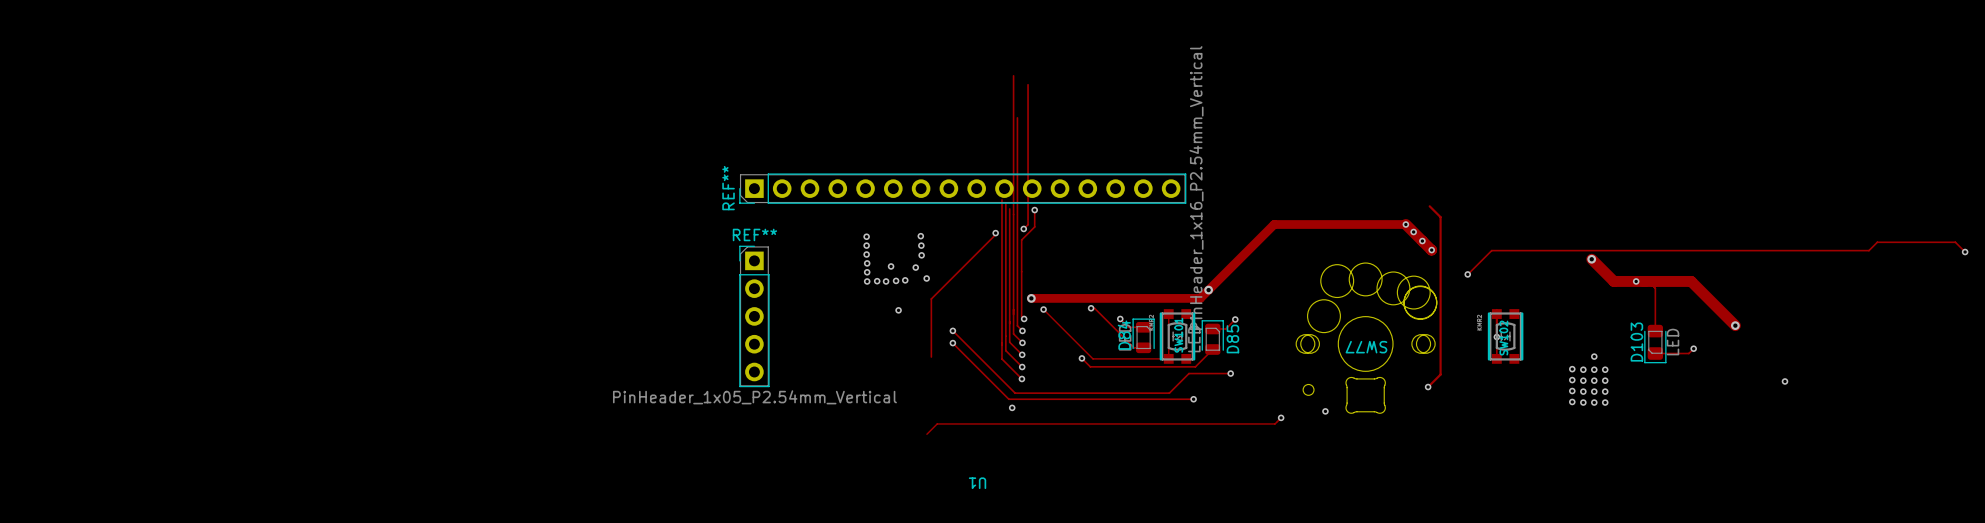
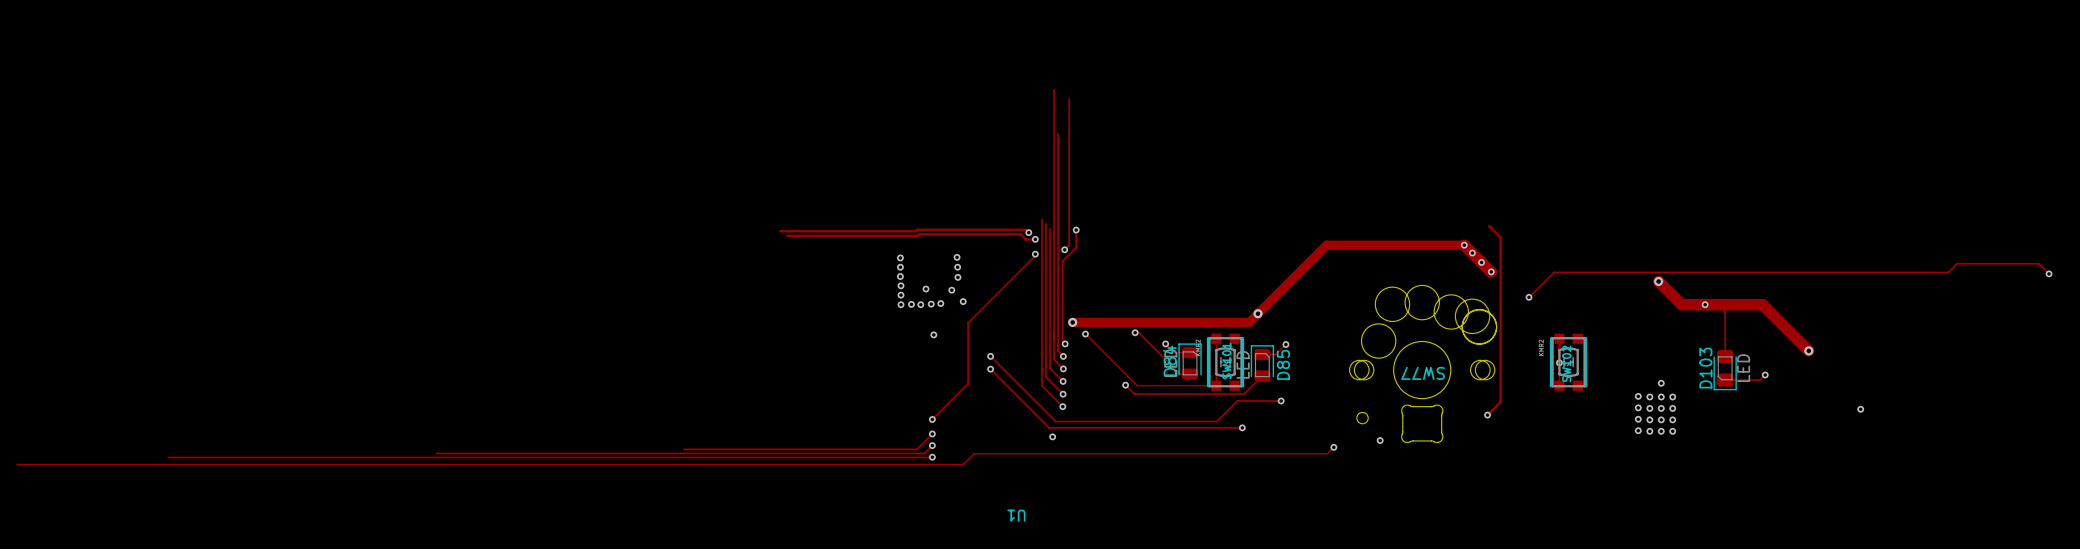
REF**: PinHeader_1x16_P2.54mm_Vertical (962, 188) -> none
track: none -> (780, 231) (1025, 229) (1028, 232)
via: none -> (1028, 232)
track: none -> (787, 235) (1020, 234) (1025, 239) (1035, 239)
via: none -> (1035, 239)
REF**: PinHeader_1x05_P2.54mm_Vertical (754, 316) -> none
track: none -> (968, 383) (932, 419)
via: none -> (932, 419)
track: none -> (932, 433) (916, 449) (684, 449)
via: none -> (932, 433)
track: none -> (932, 445) (924, 453) (436, 453)
via: none -> (932, 445)
track: none -> (932, 457) (168, 457)
via: none -> (932, 457)
track: none -> (17, 464) (963, 464)

